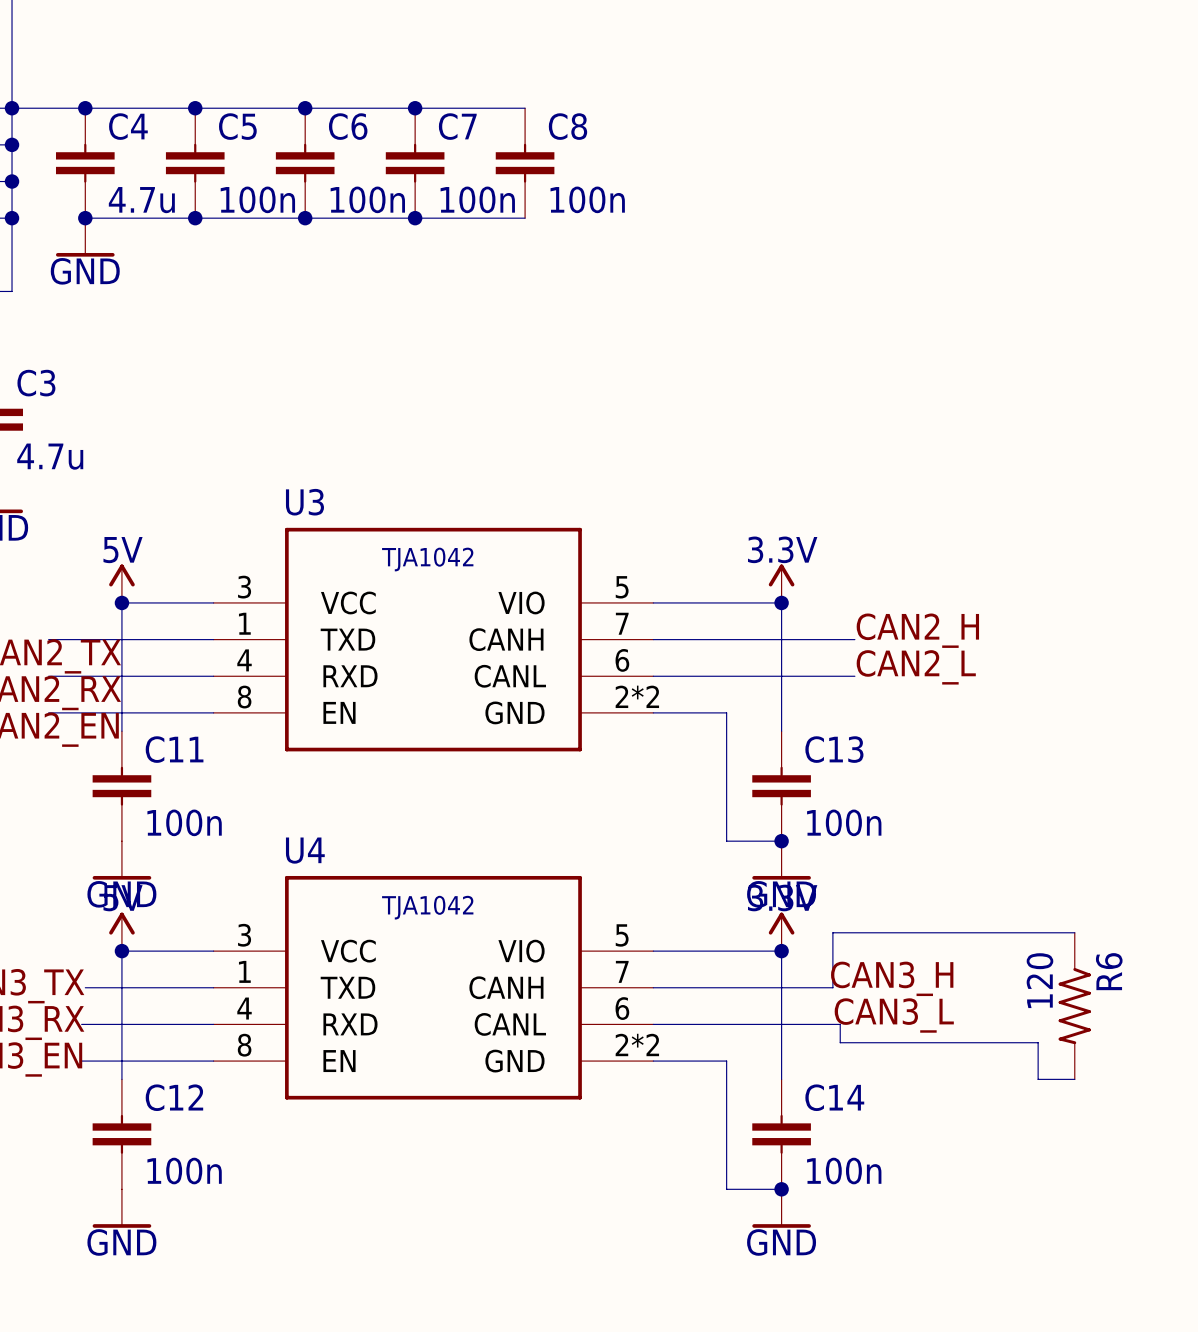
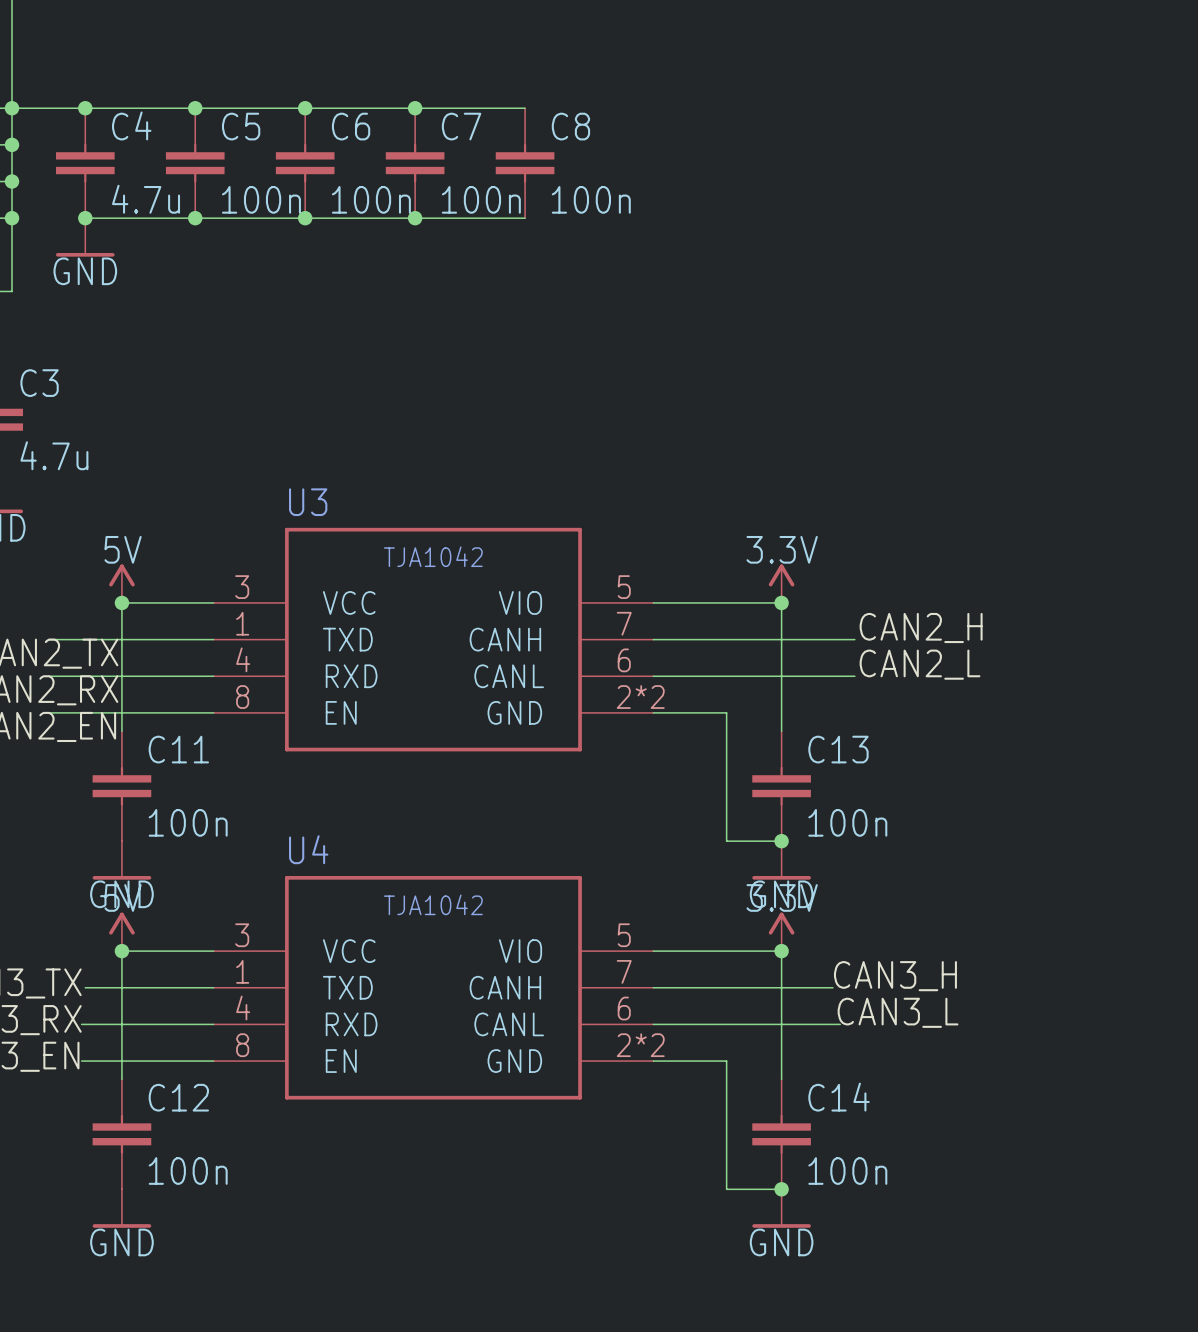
wire: (1074, 932) (832, 932) (832, 987) -> none
R6: 120 (1074, 1006) -> none
wire: (840, 1024) (840, 1042) (1038, 1042) (1038, 1079) (1074, 1079) -> none

